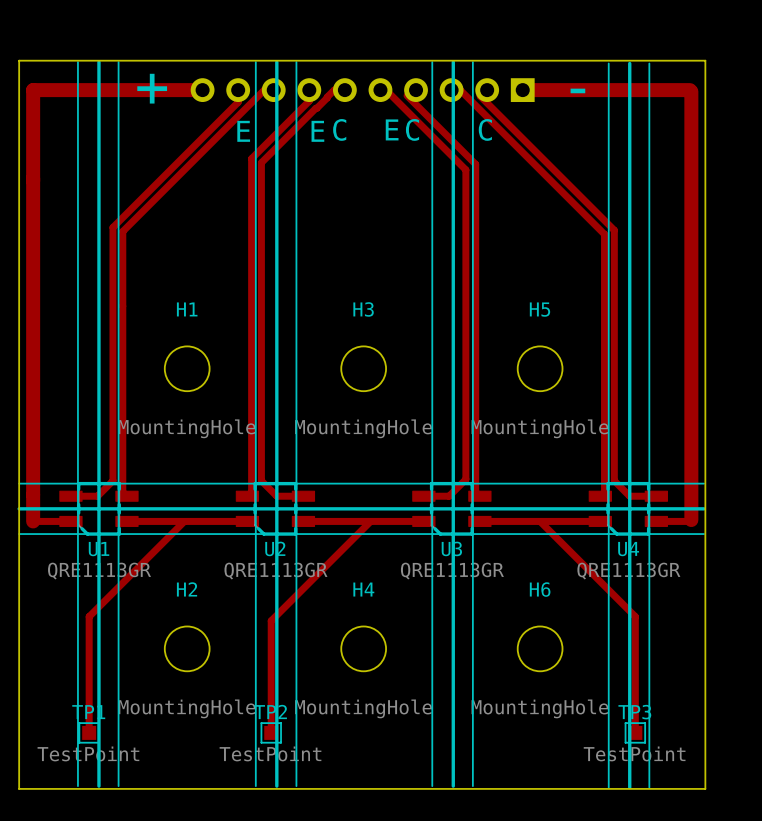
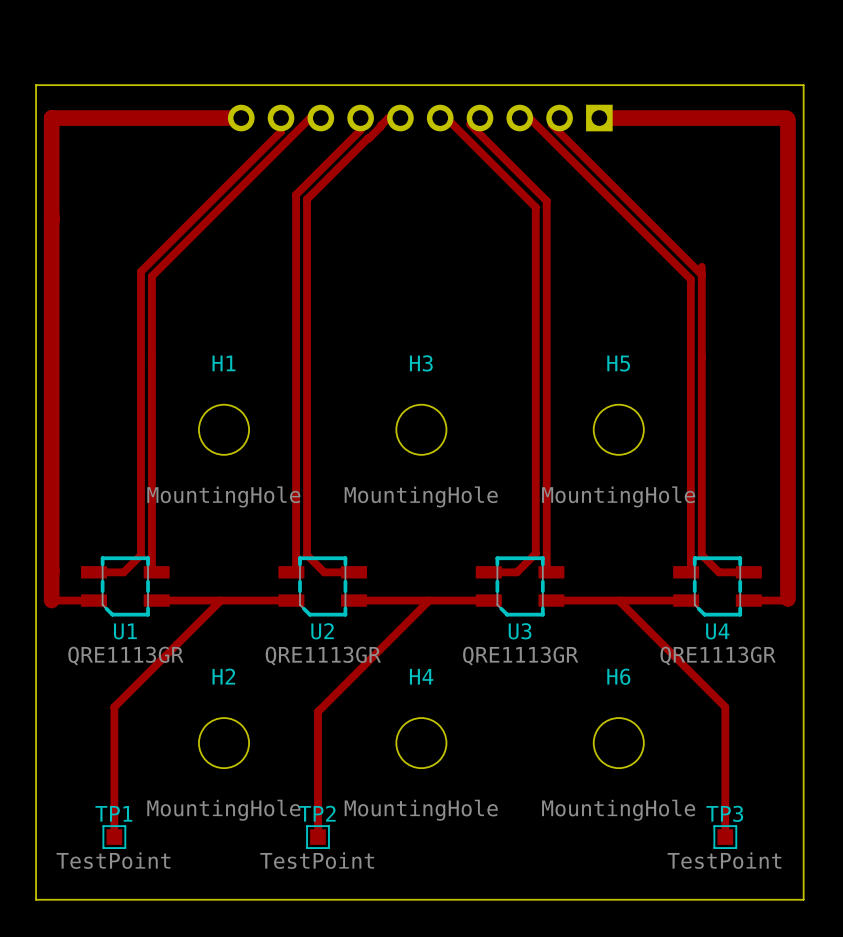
line: (77, 62) (77, 786) -> none
line: (98, 62) (98, 786) -> none
line: (118, 62) (118, 786) -> none
line: (255, 62) (255, 786) -> none
line: (276, 62) (276, 786) -> none
line: (296, 62) (296, 786) -> none
line: (432, 62) (432, 786) -> none
line: (453, 62) (453, 786) -> none
line: (472, 62) (472, 786) -> none
line: (608, 63) (608, 787) -> none
line: (629, 63) (629, 787) -> none
line: (649, 63) (649, 787) -> none
text: + (152, 88) -> none
text: - (577, 90) -> none
text: C (339, 129) -> none
text: E (392, 129) -> none
text: C (412, 129) -> none
text: C (485, 129) -> none
text: E (243, 131) -> none
text: E (317, 131) -> none
line: (19, 483) (703, 483) -> none
line: (19, 508) (703, 508) -> none
line: (19, 534) (703, 534) -> none

